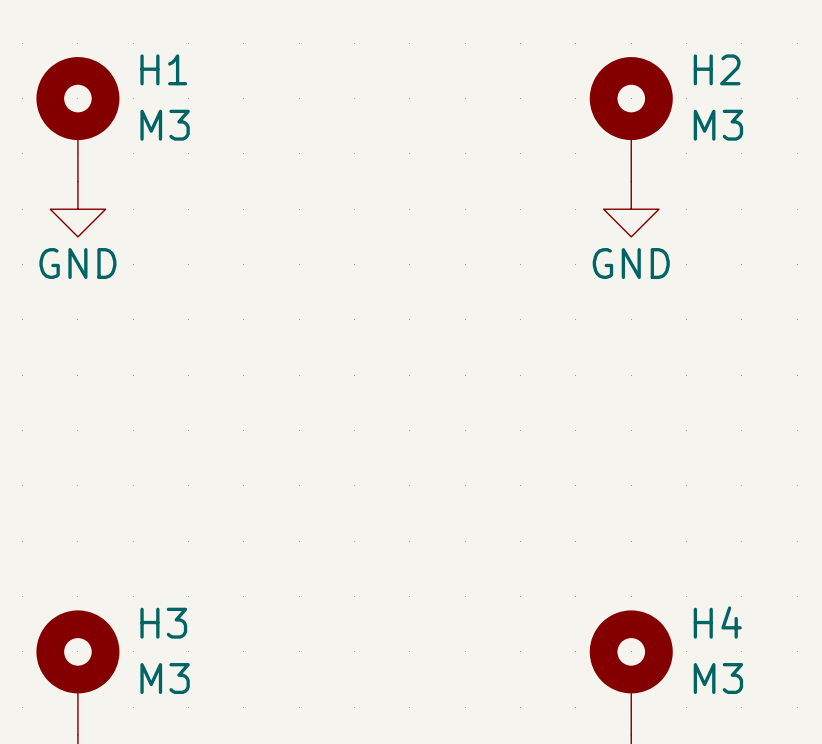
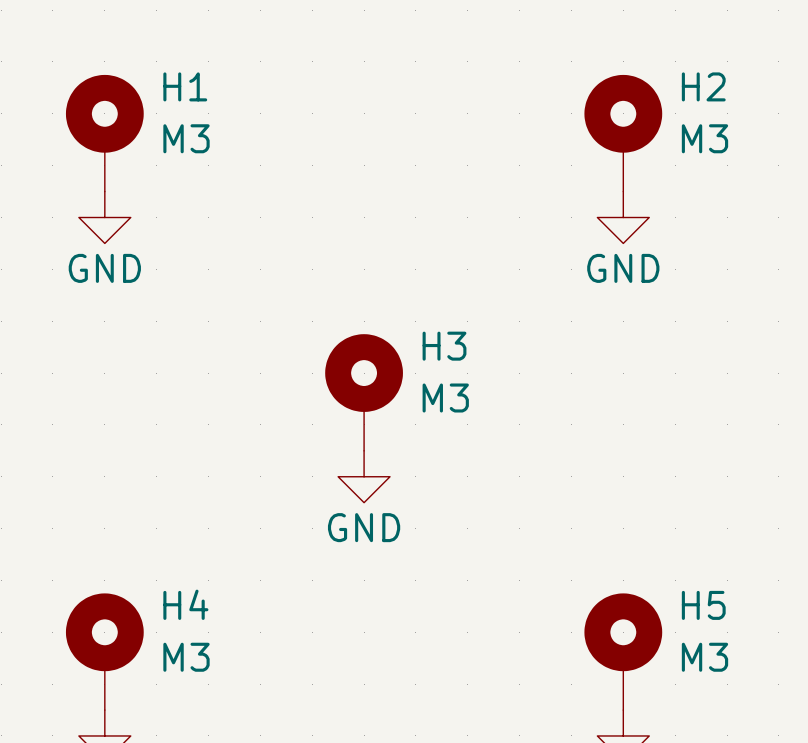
H3: none -> M3 (364, 392)
power symbol: none -> GND (364, 476)
H4 name: H4 (717, 622) -> H5 (703, 605)
H3 name: H3 (163, 623) -> H4 (185, 604)

